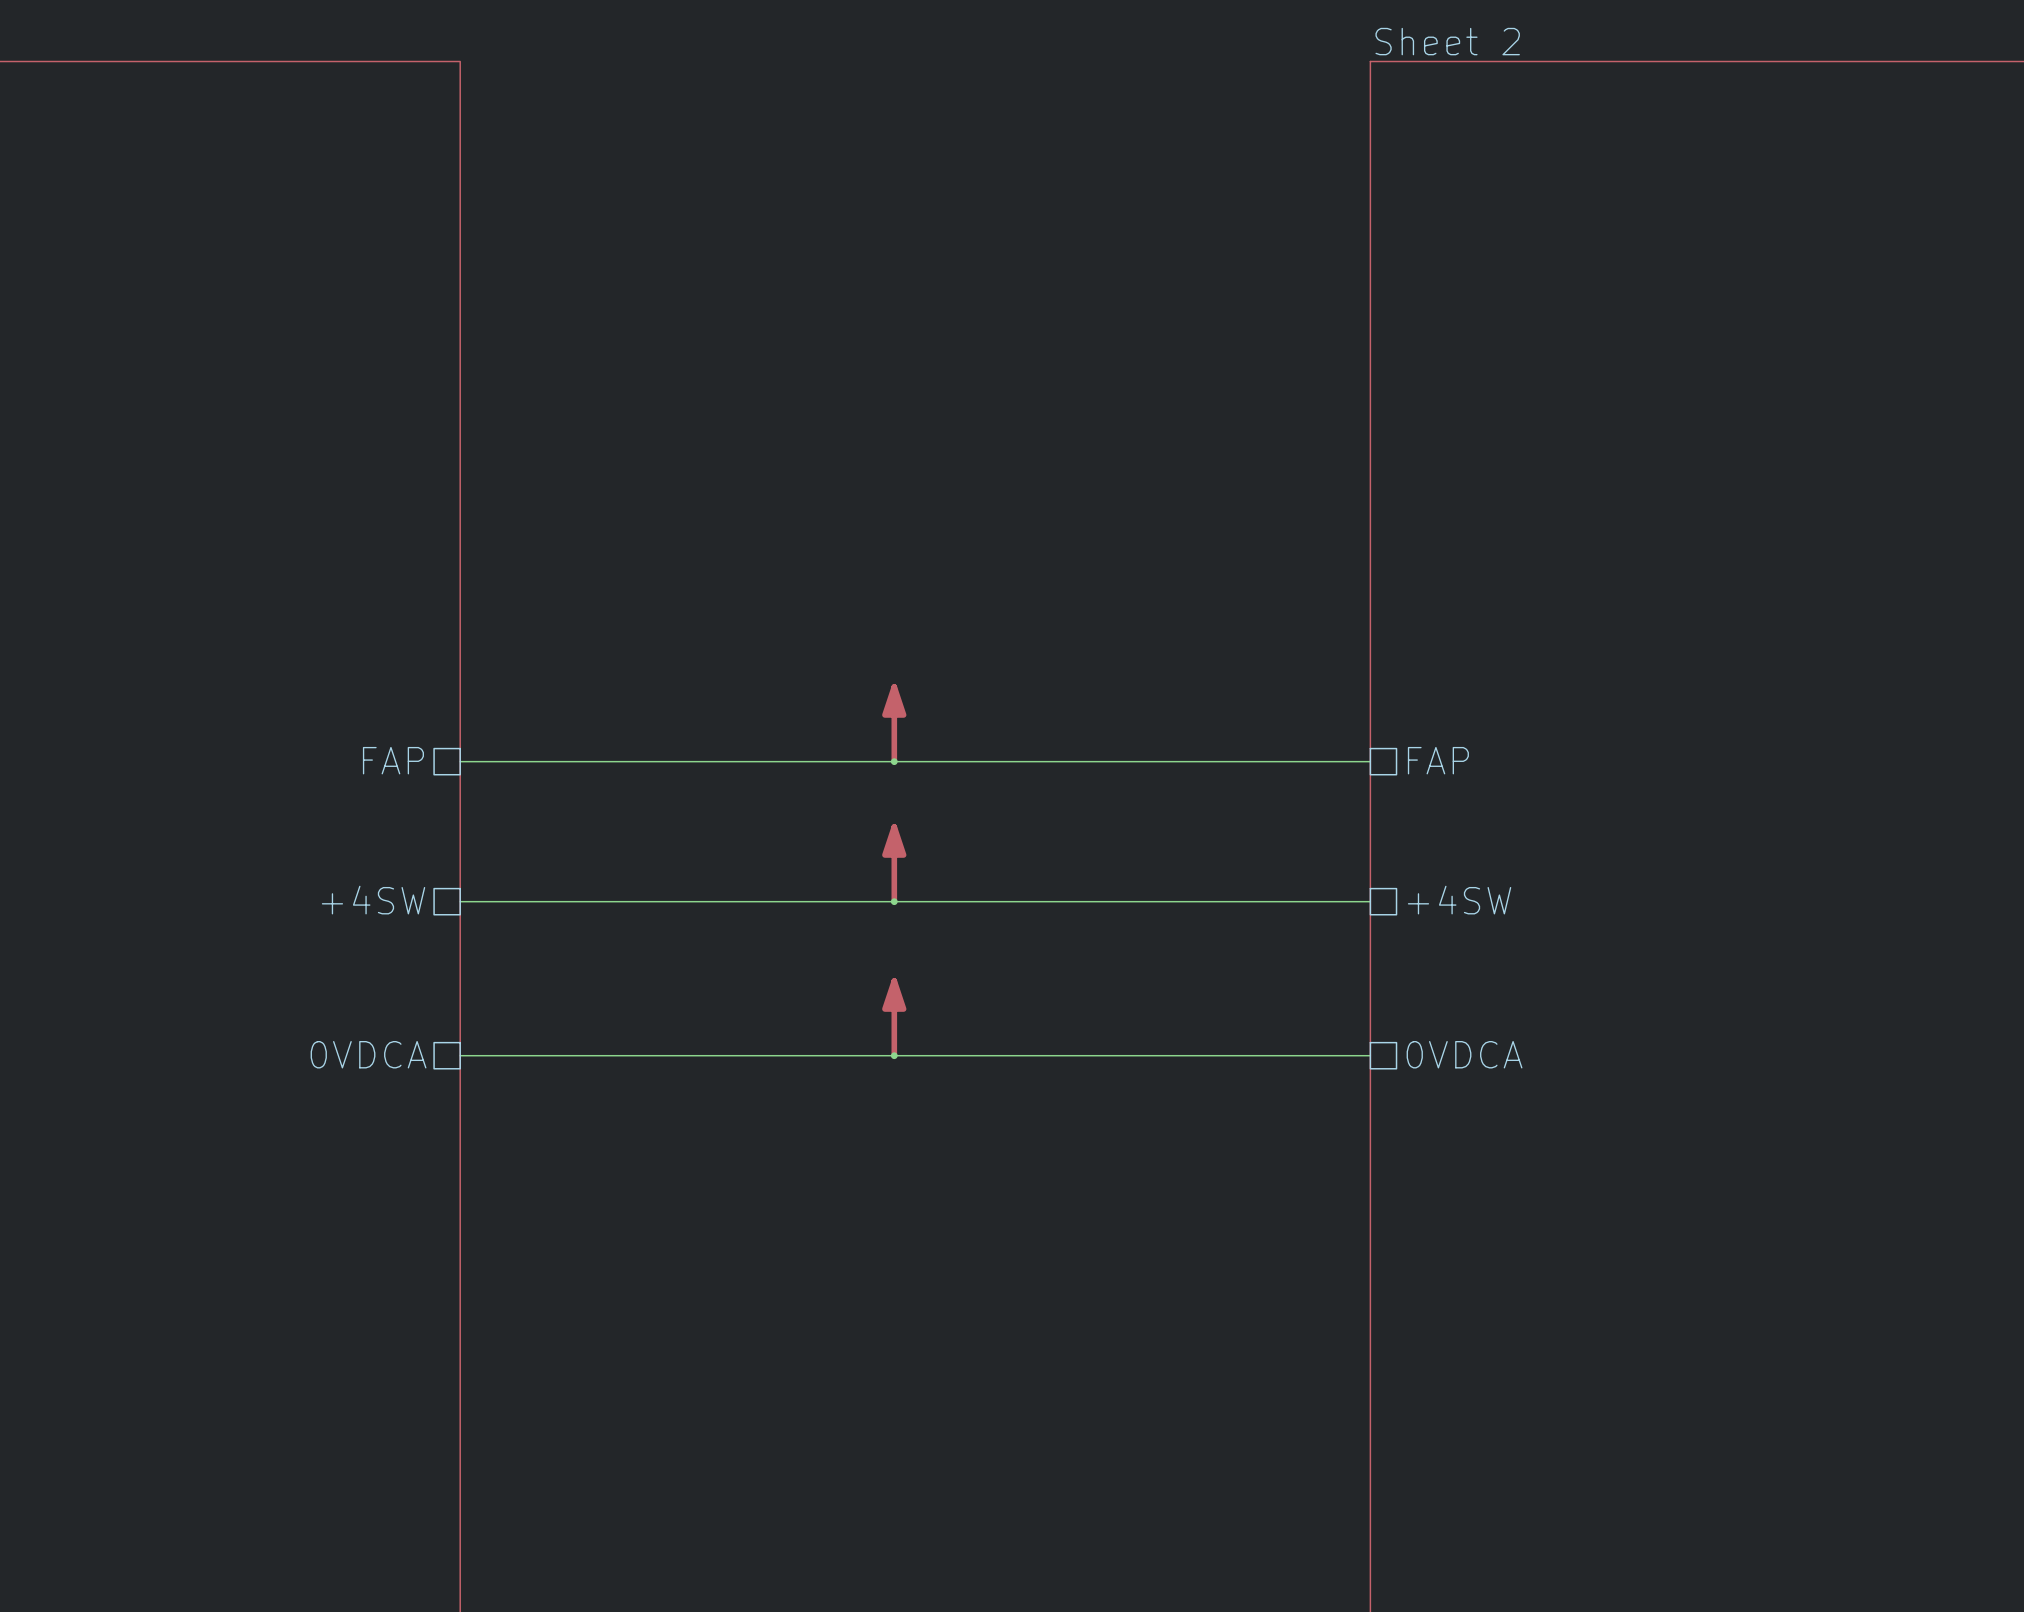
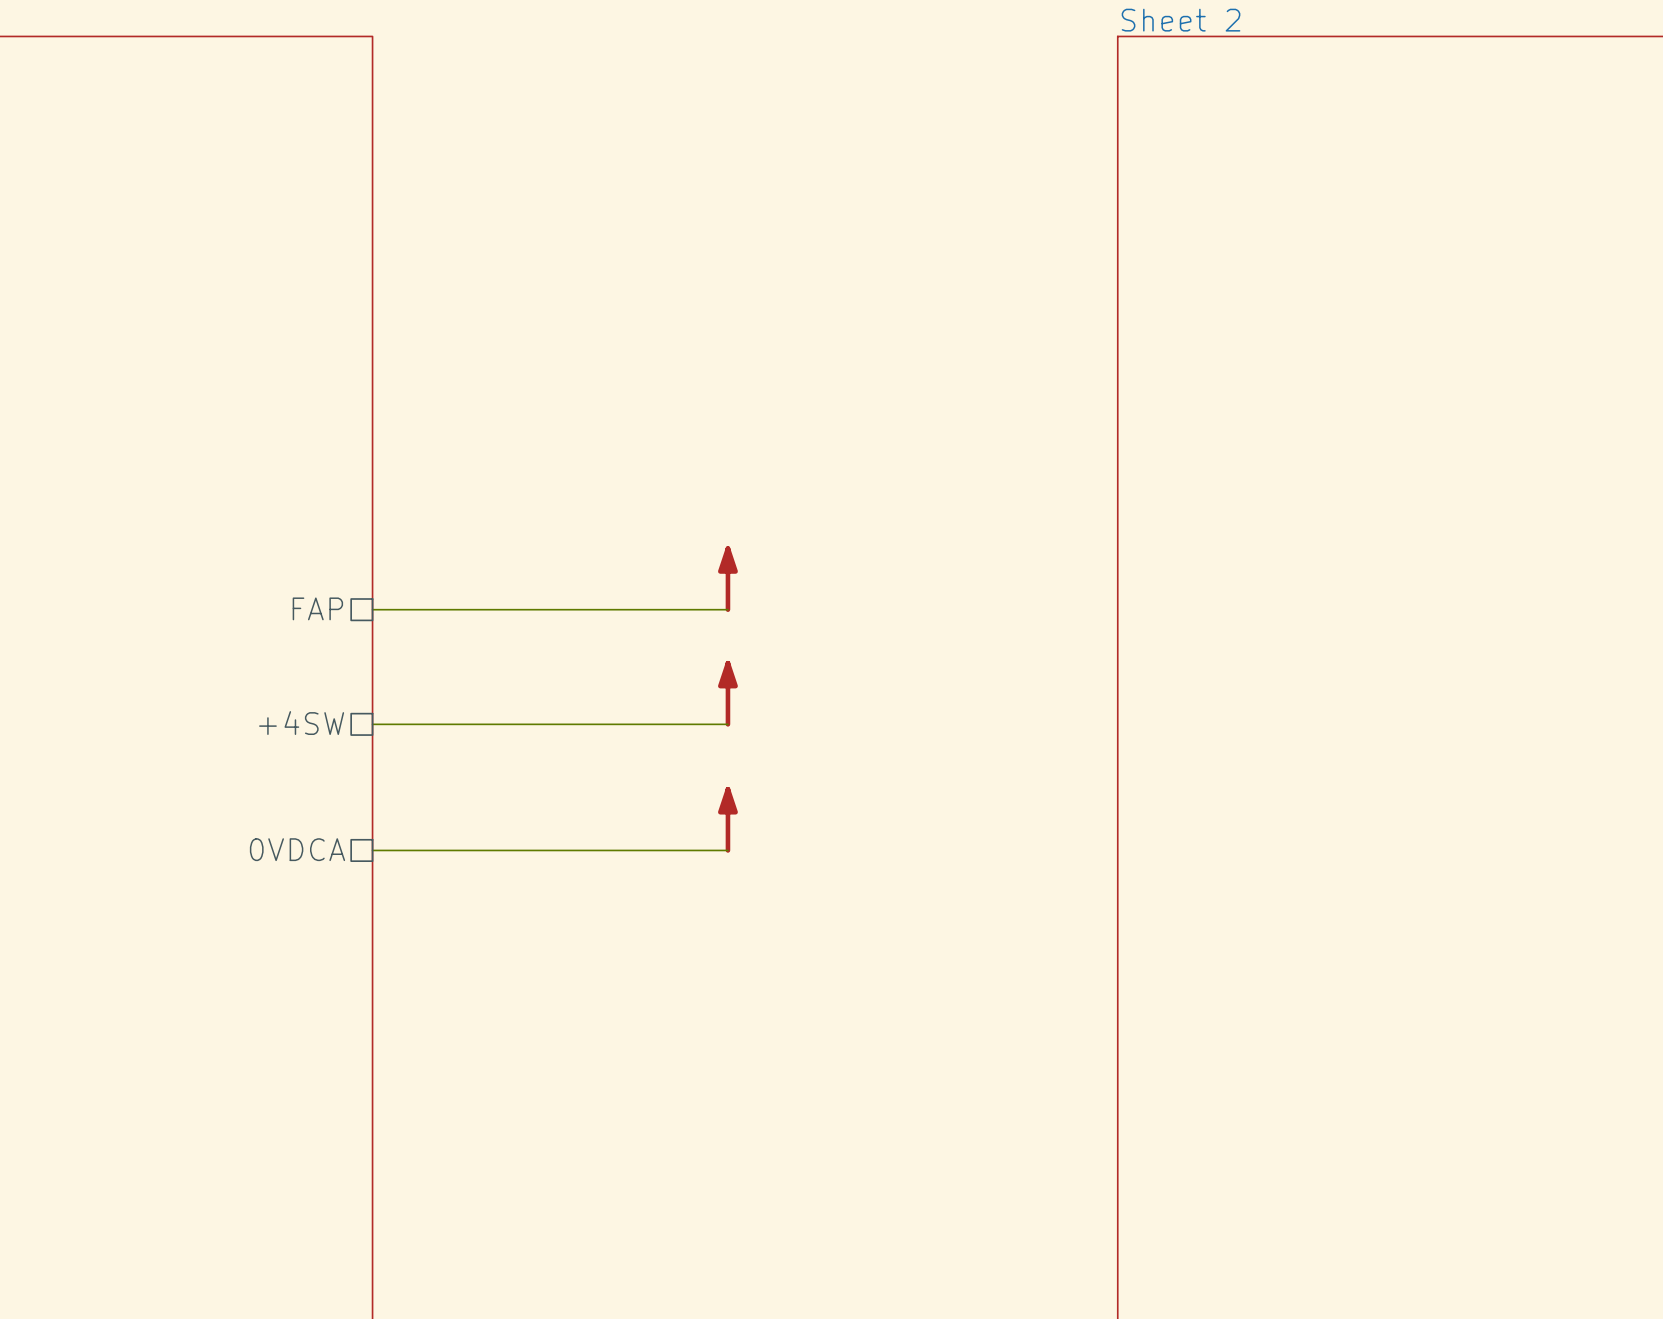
sheet pin: FAP (1438, 760) -> none
wire: (894, 761) (1370, 761) -> none
junction: (894, 761) -> none
sheet pin: +4SW (1459, 900) -> none
wire: (894, 901) (1370, 901) -> none
junction: (894, 901) -> none
sheet pin: 0VDCA (1464, 1054) -> none
wire: (894, 1055) (1370, 1055) -> none
junction: (894, 1055) -> none

